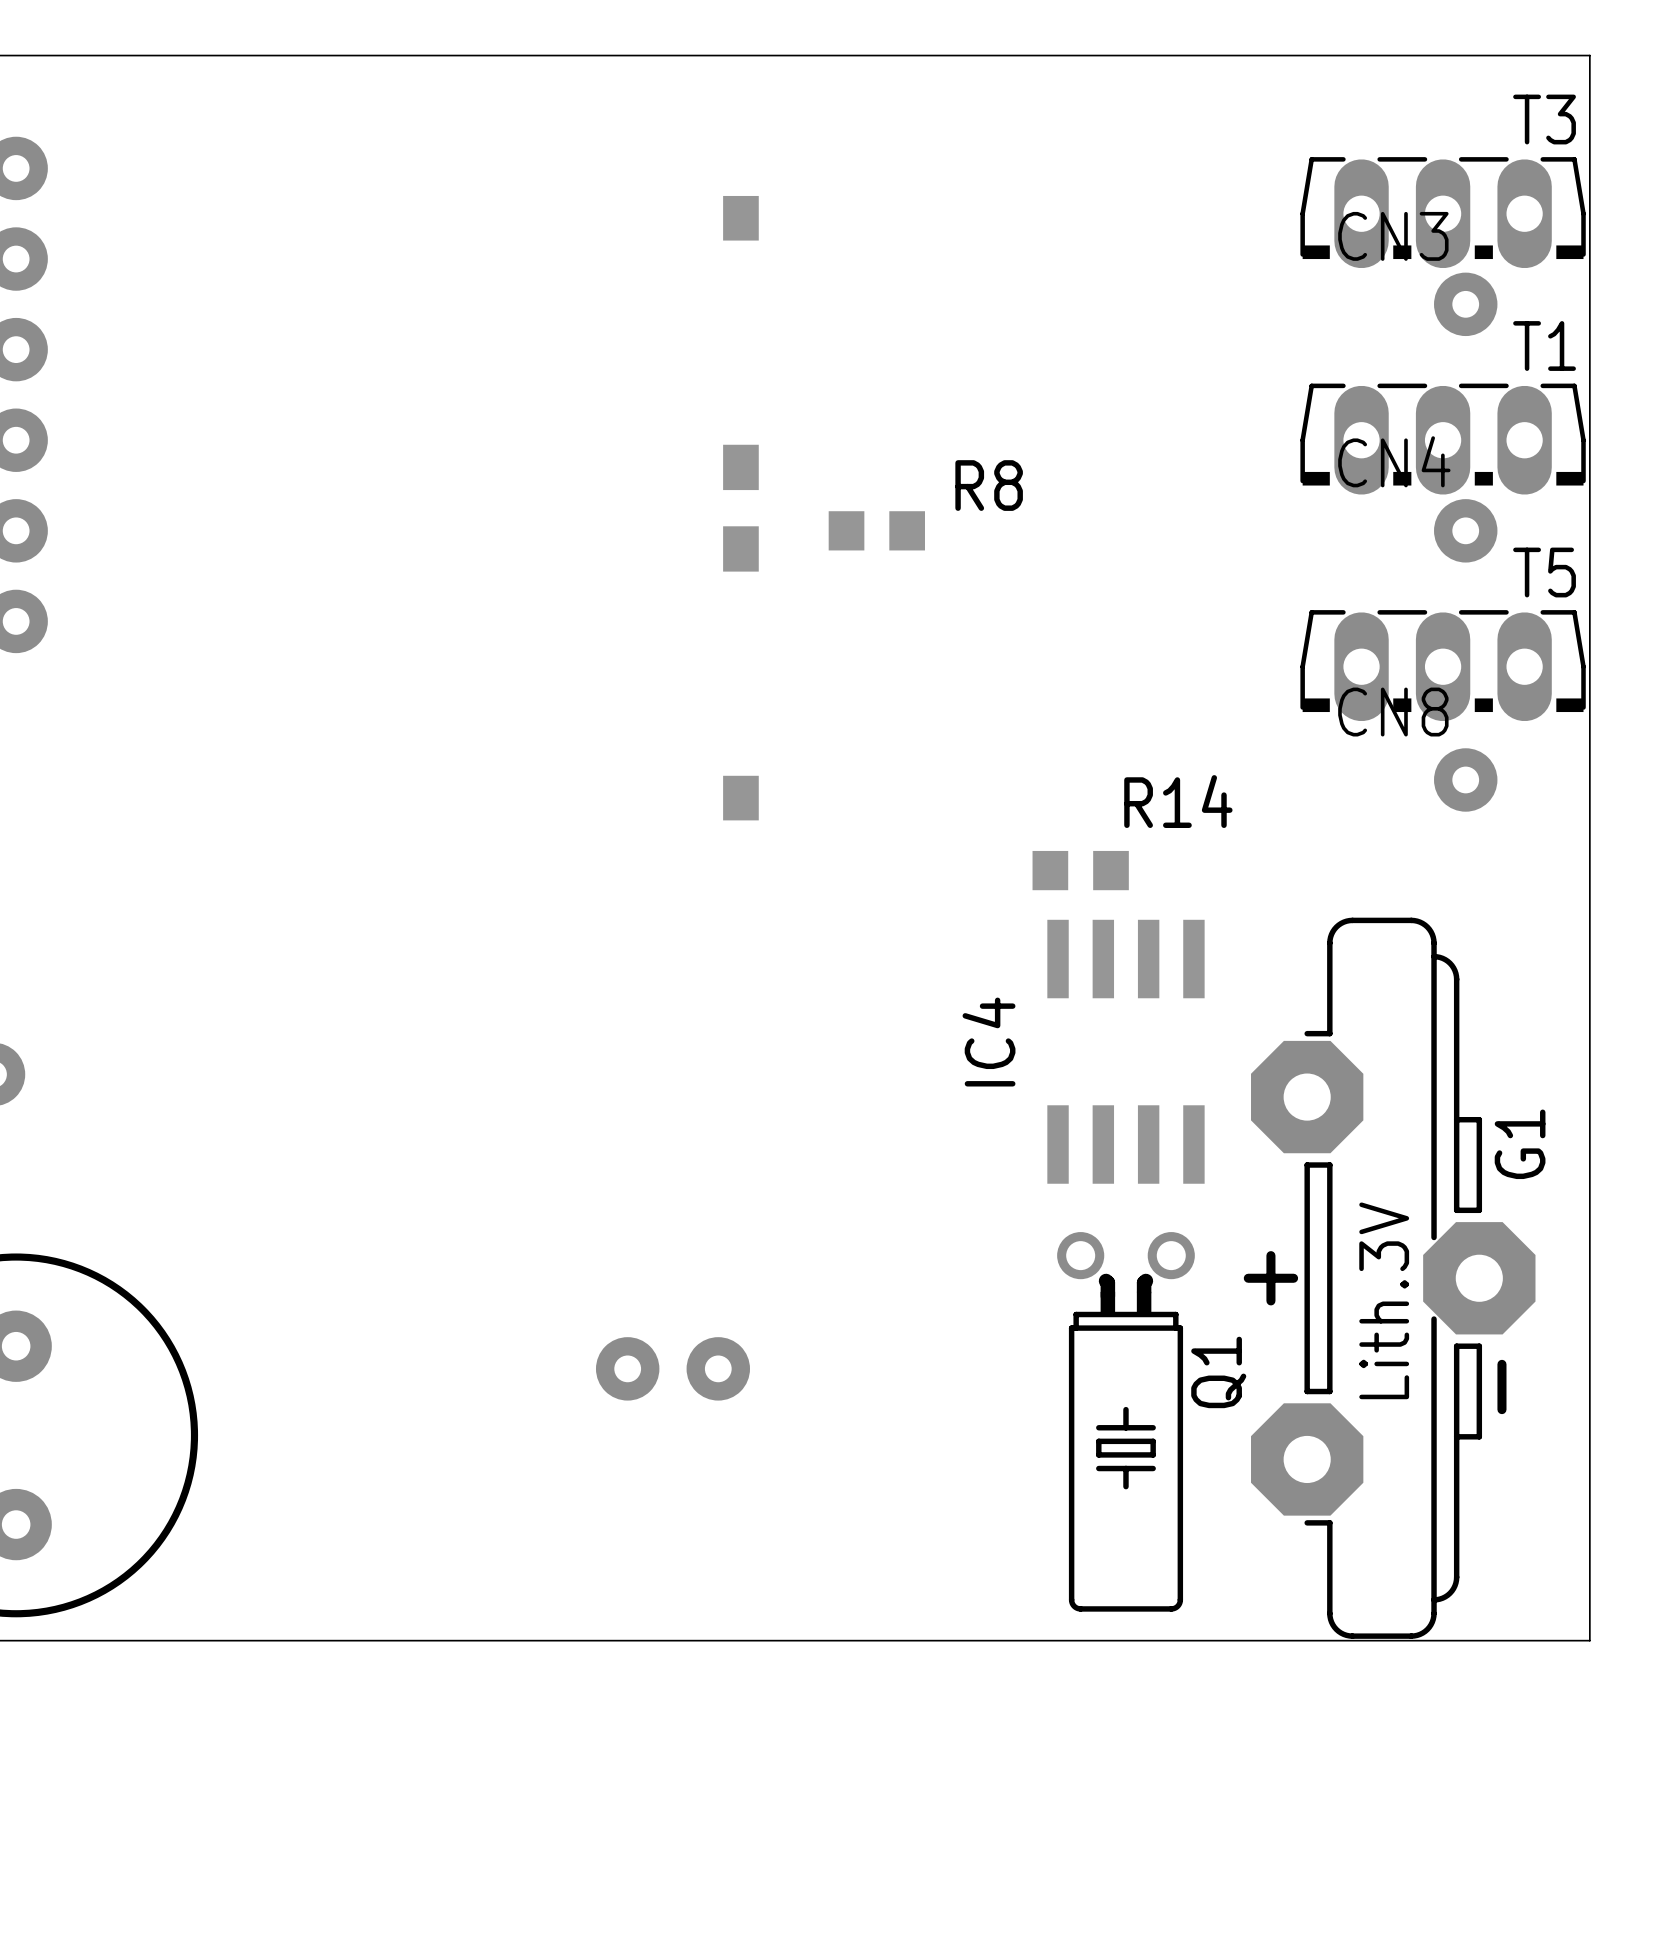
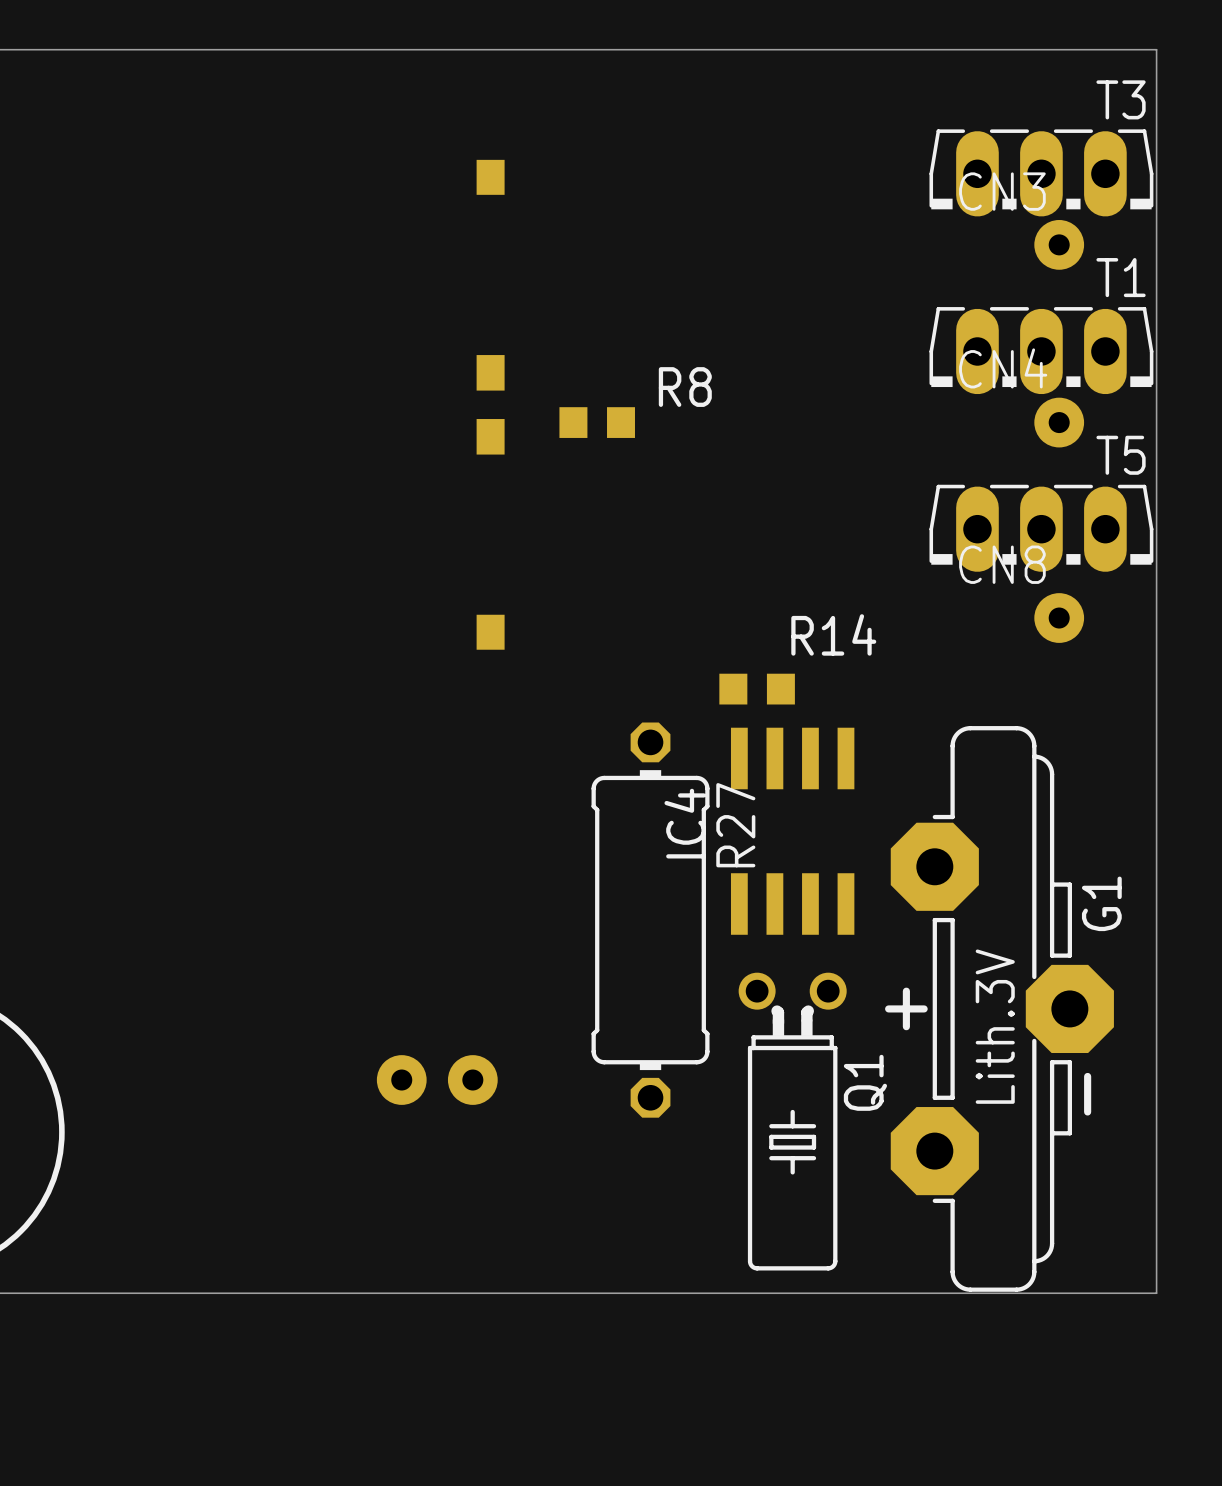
R27: none -> (650, 920)

